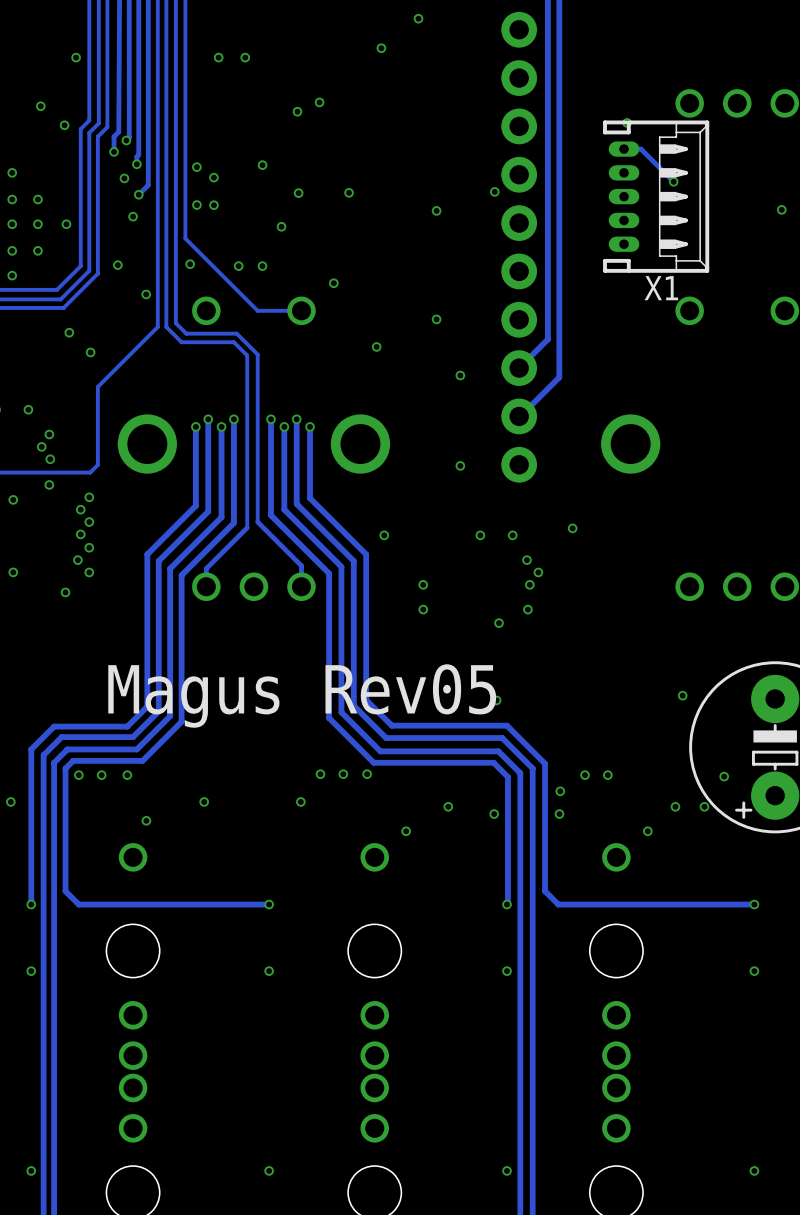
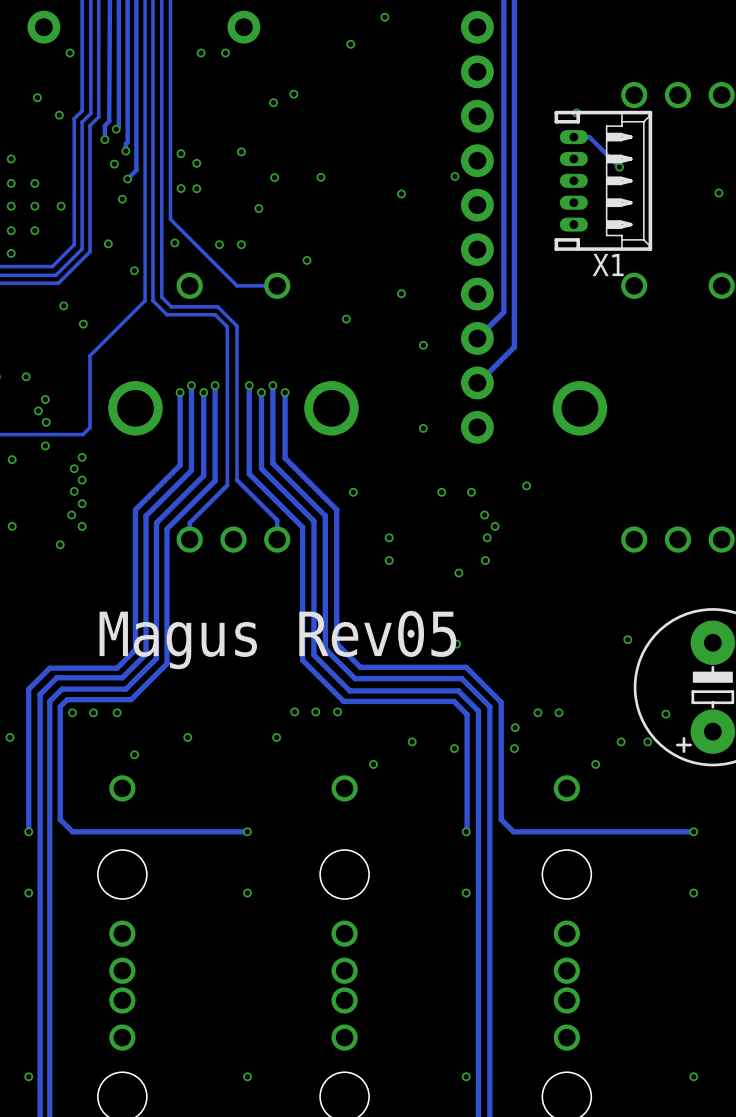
part: none -> (43, 27)
part: none -> (243, 27)

